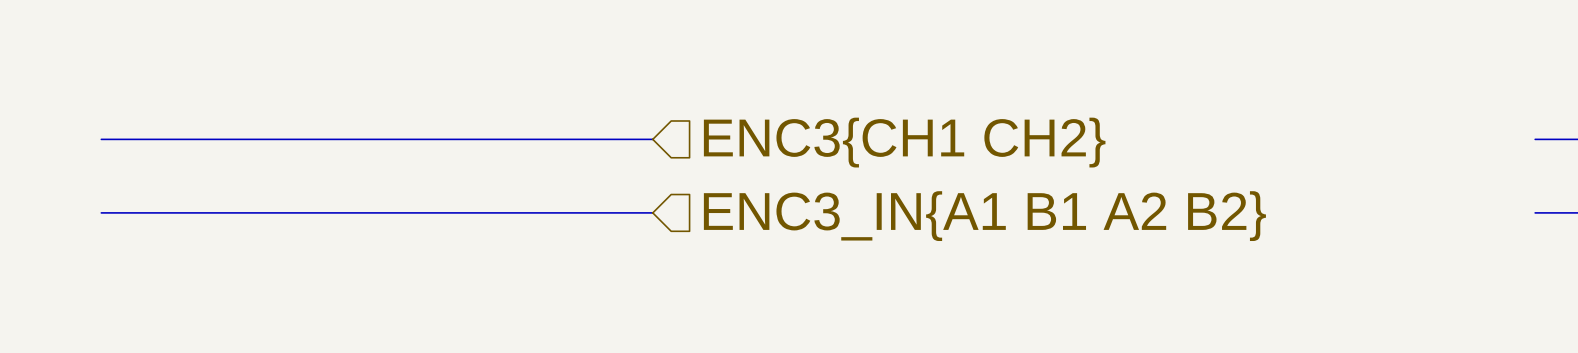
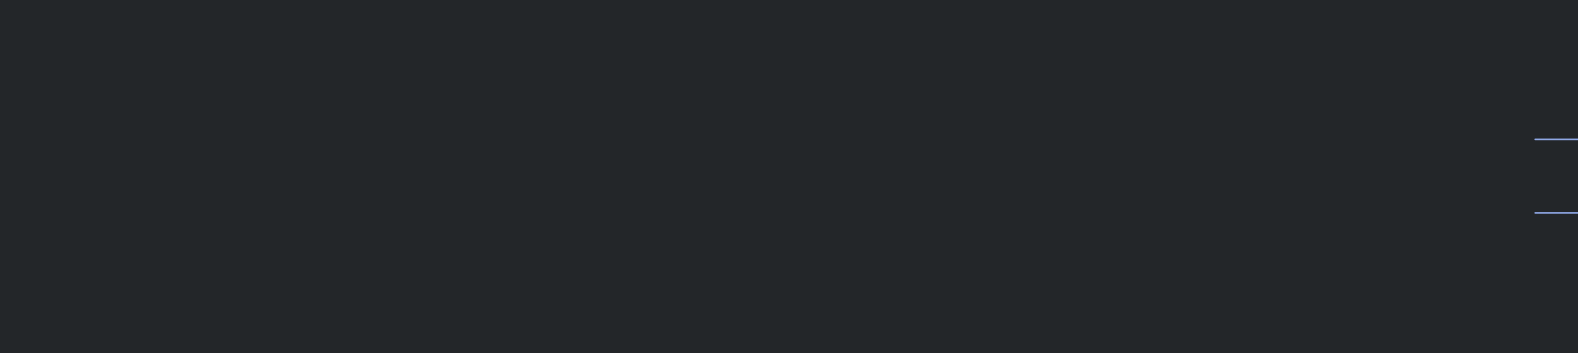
bus: (101, 139) (652, 139) -> none
hierarchical label: ENC3{CH1 CH2} (904, 142) -> none
bus: (101, 212) (652, 212) -> none
hierarchical label: ENC3_IN{A1 B1 A2 B2} (984, 216) -> none

